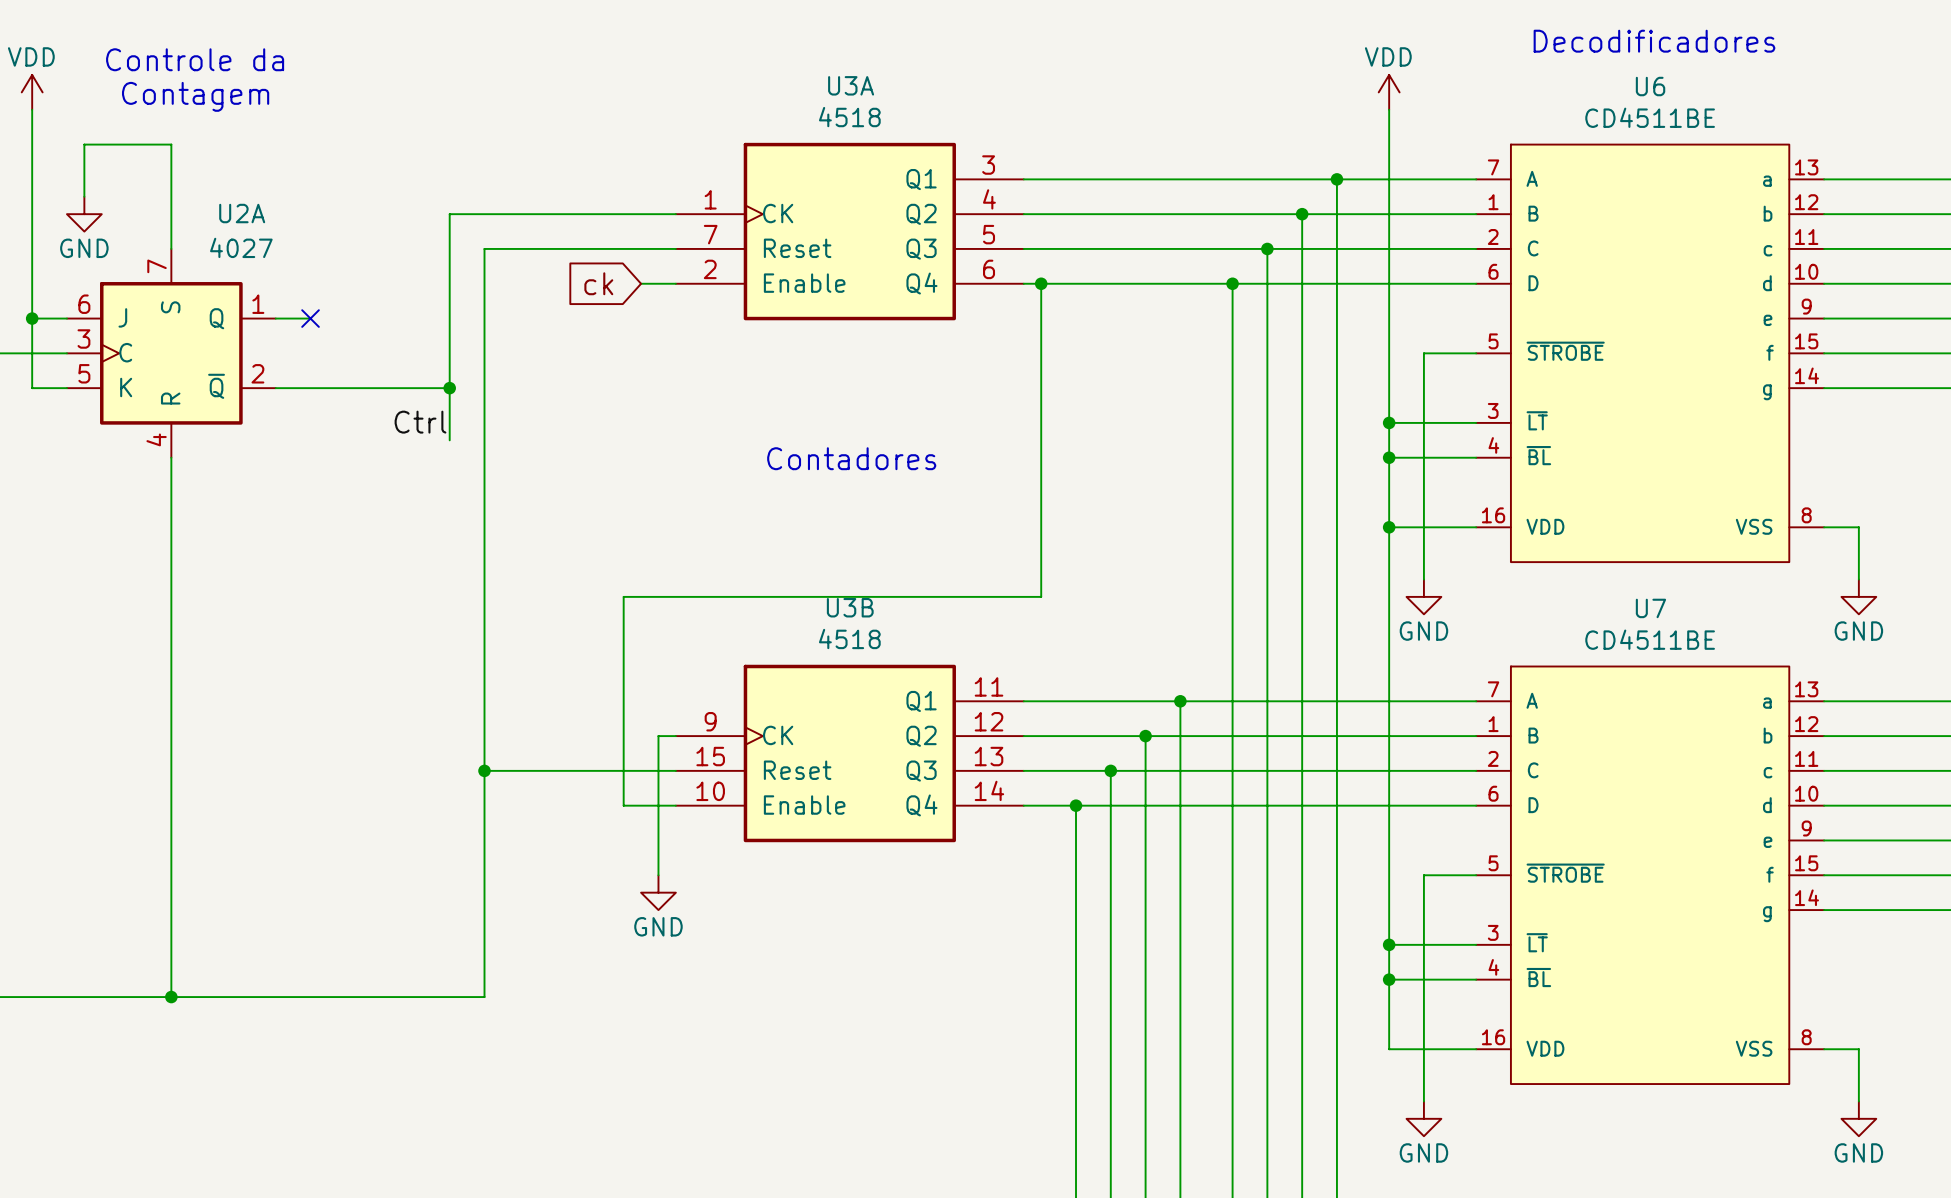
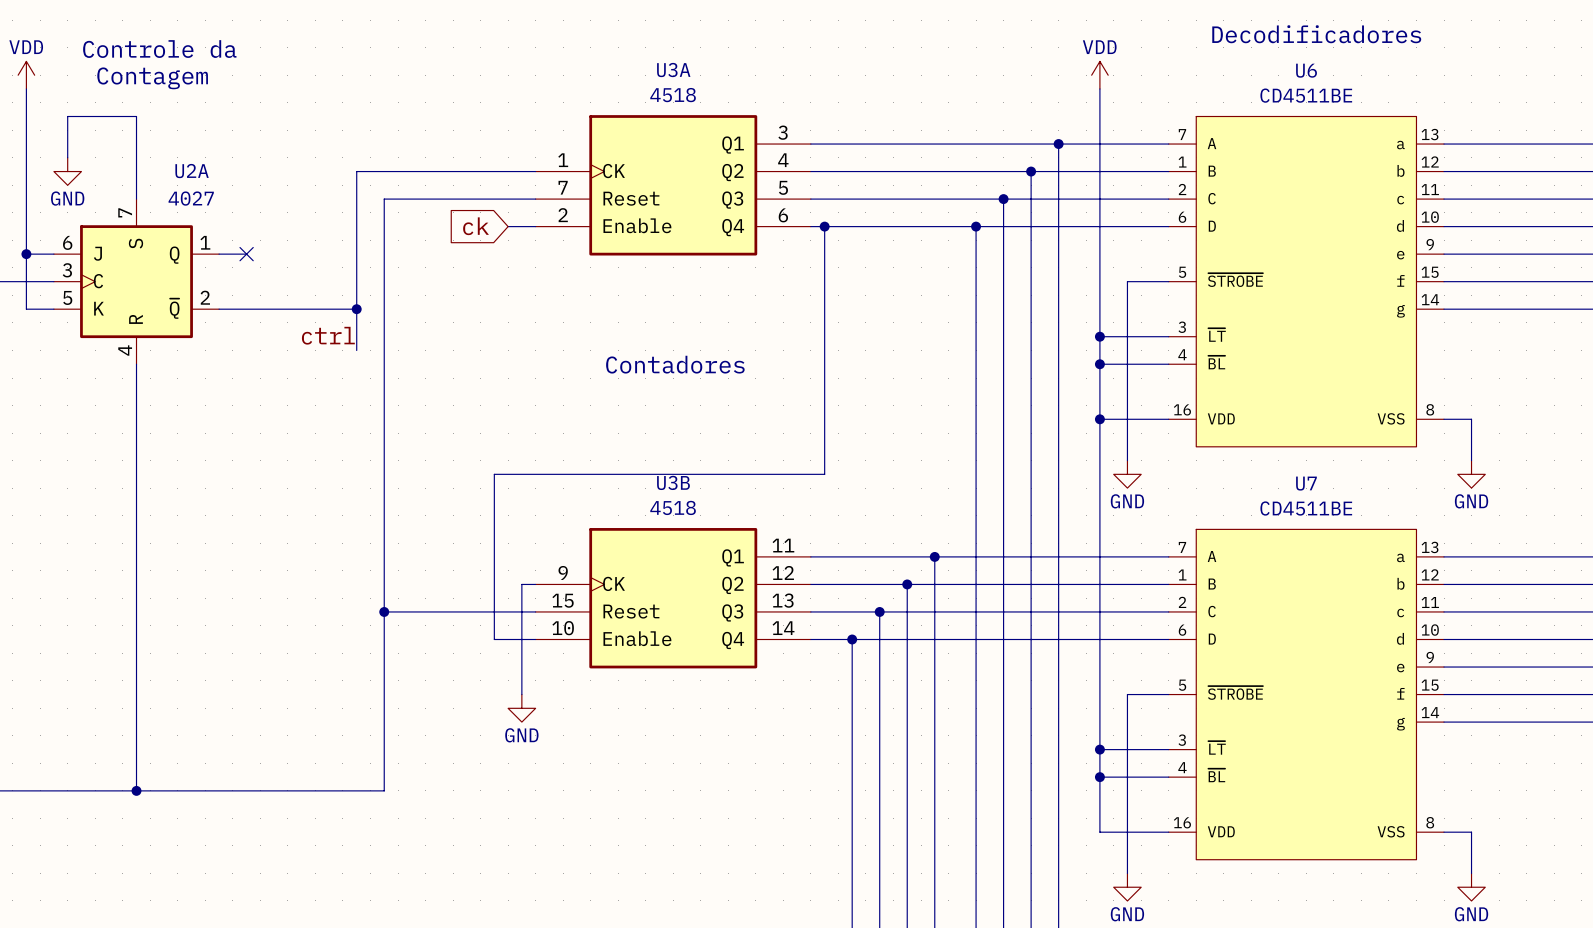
label: Ctrl (420, 422) -> ctrl (328, 335)

